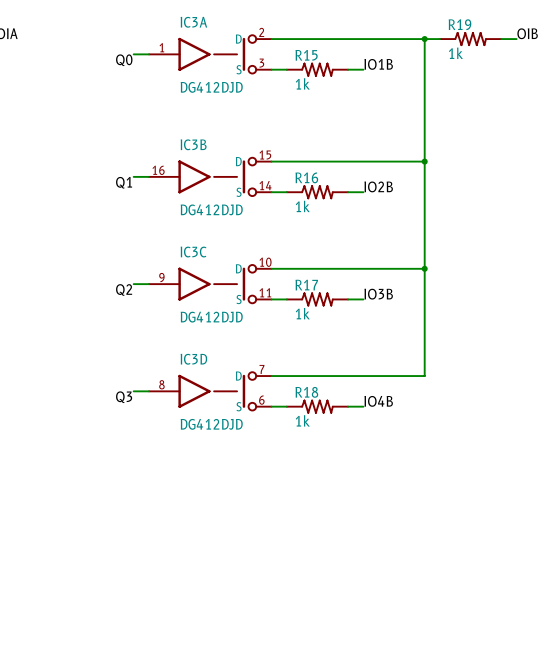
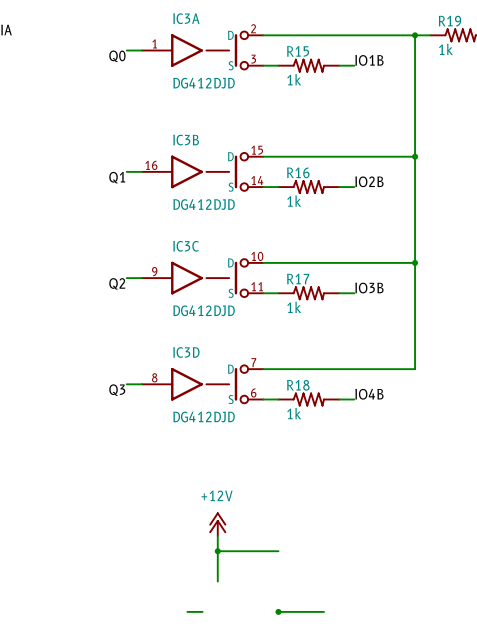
power symbol: none -> +12V (217, 524)
wire: none -> (217, 536) (217, 581)
wire: none -> (217, 551) (278, 551)
junction: none -> (217, 551)
wire: none -> (187, 611) (202, 611)
wire: none -> (278, 611) (323, 611)
junction: none -> (278, 611)

